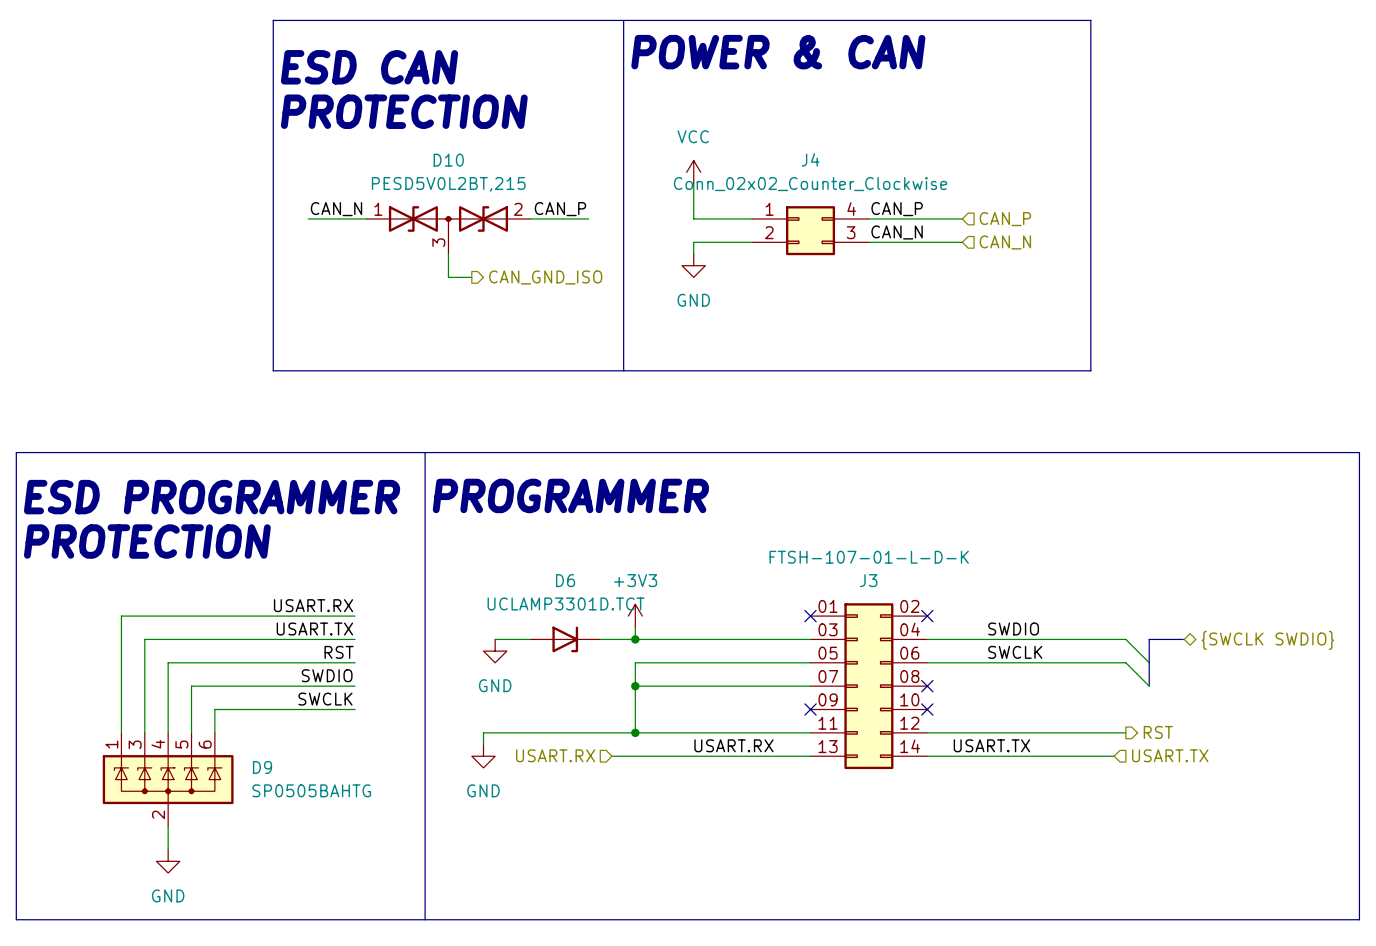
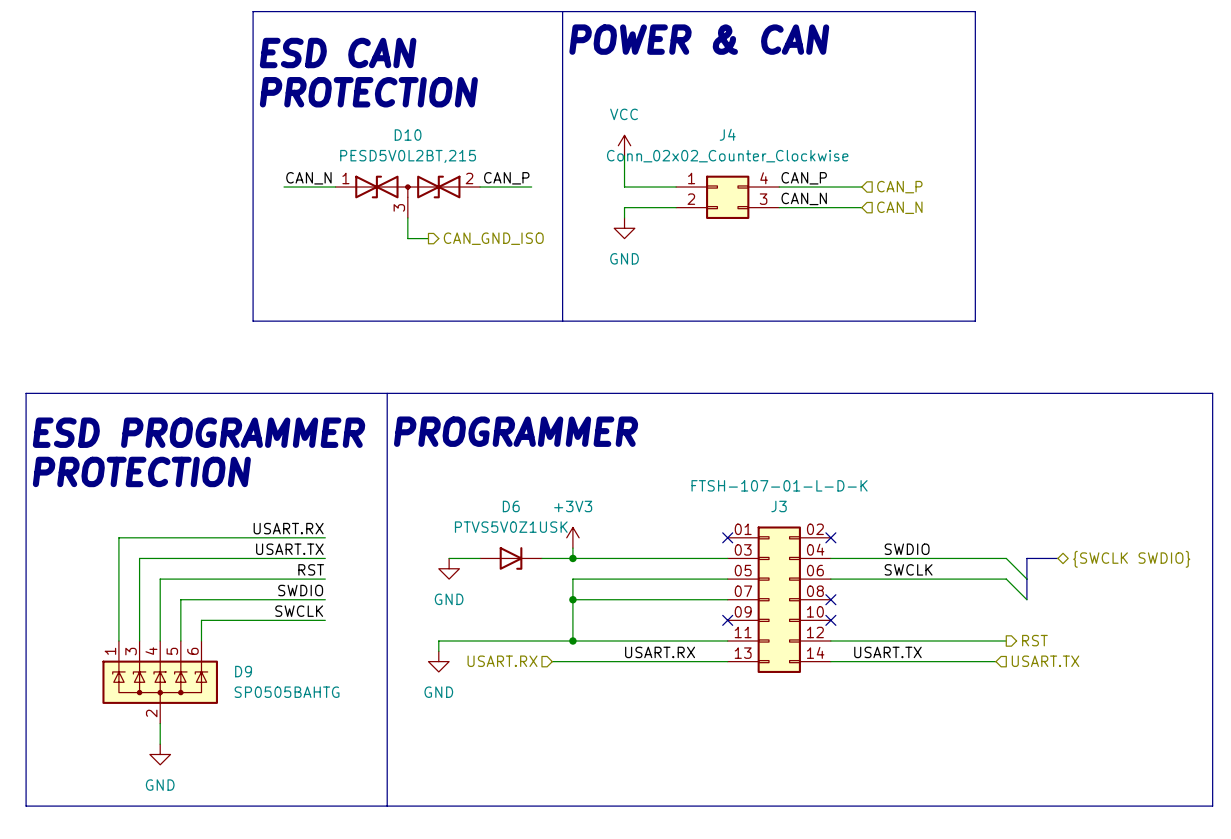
D6 value: UCLAMP3301D.TCT (566, 603) -> PTVS5V0Z1USK (511, 527)

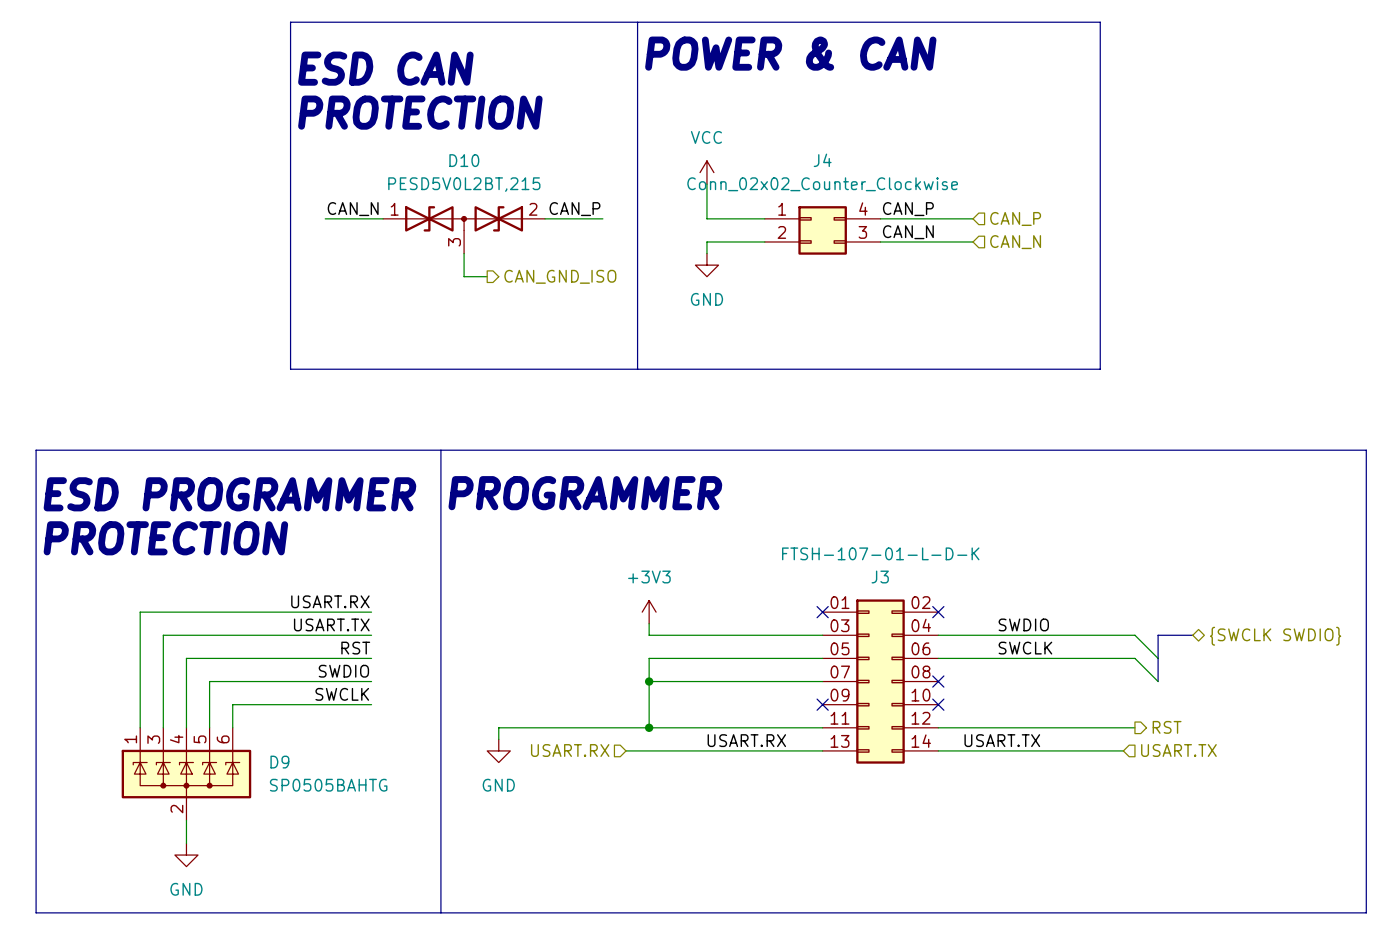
wire: (449, 558) (480, 558) -> none
D6: PTVS5V0Z1USK (511, 558) -> none
wire: (541, 558) (572, 558) -> none
junction: (572, 558) -> none
power symbol: GND (449, 568) -> none

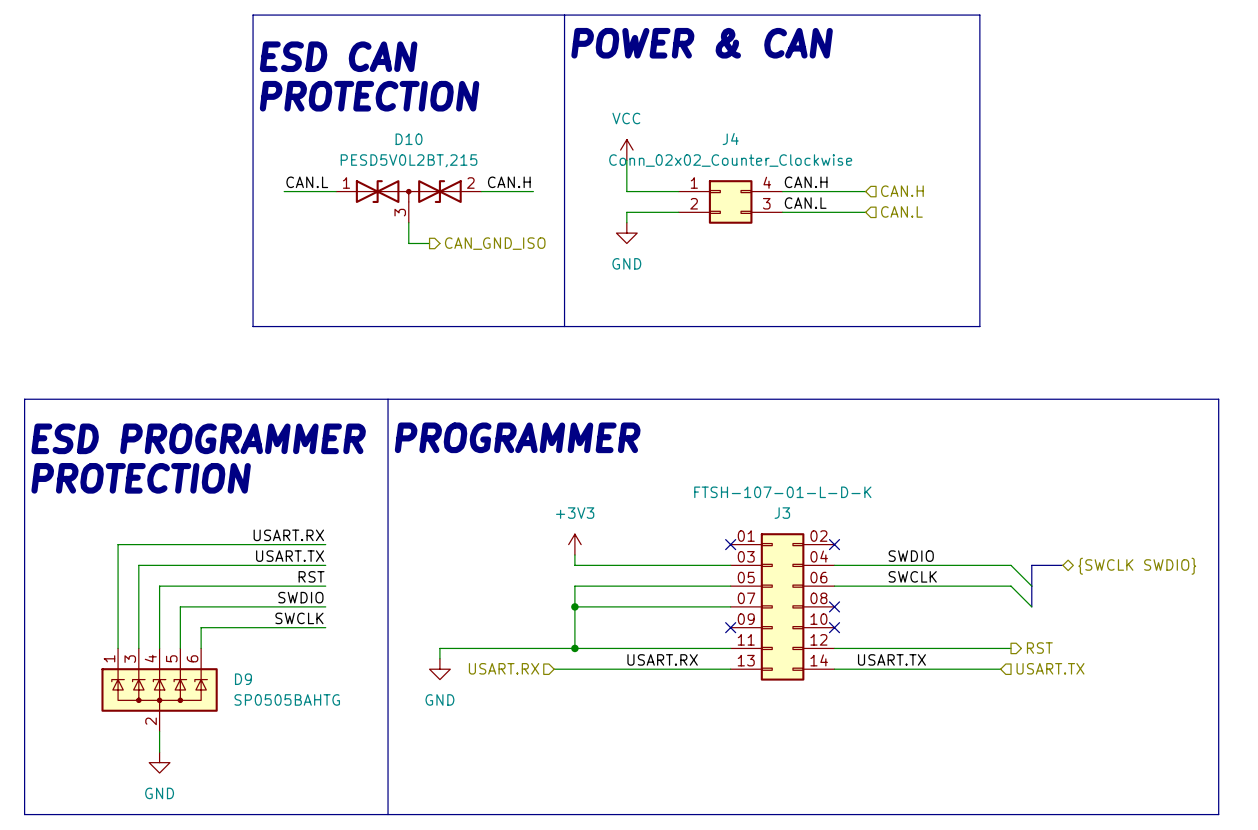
label: CAN_N (353, 209) -> CAN.L (307, 182)
label: CAN_P (574, 209) -> CAN.H (509, 182)
label: CAN_P (908, 209) -> CAN.H (806, 182)
hierarchical label: CAN_P (1015, 218) -> CAN.H (902, 191)
label: CAN_N (908, 232) -> CAN.L (805, 203)
hierarchical label: CAN_N (1015, 242) -> CAN.L (901, 211)

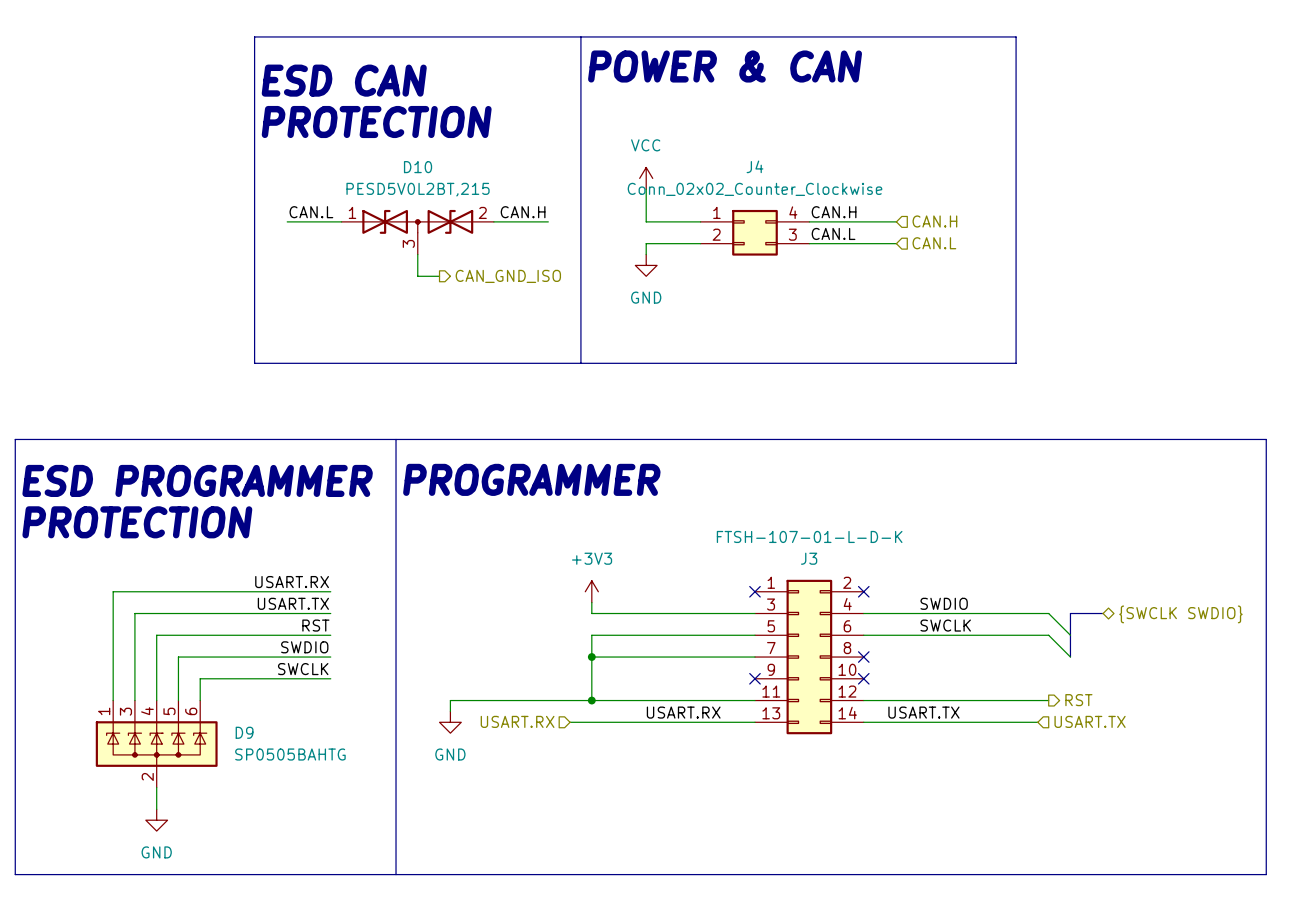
J3 symbol: [730, 533, 835, 681] -> [754, 579, 864, 735]

